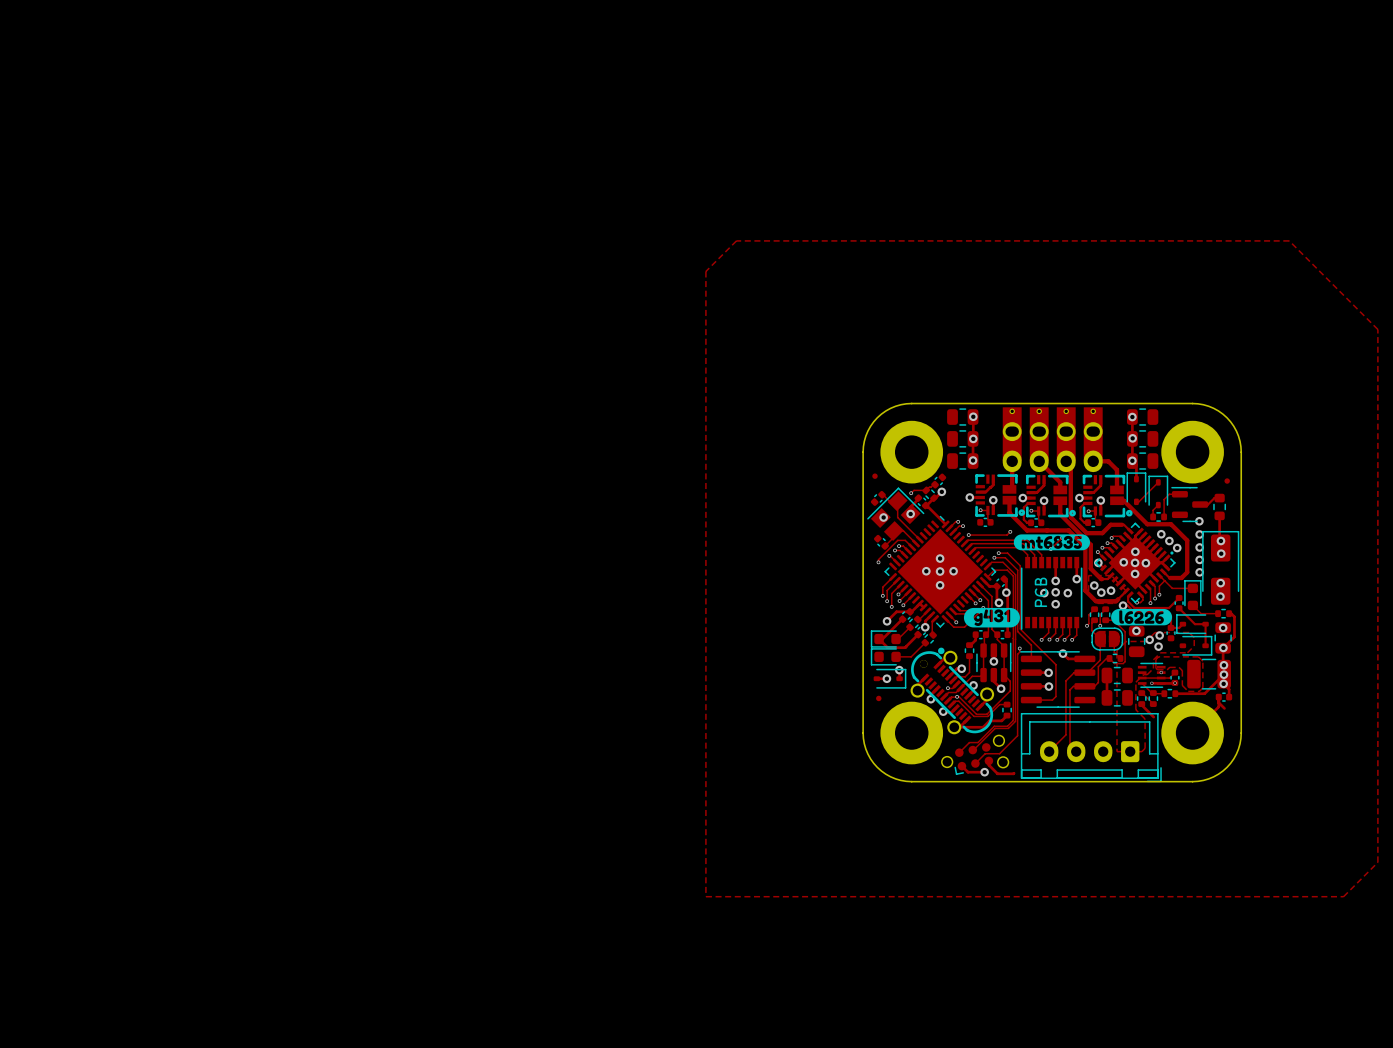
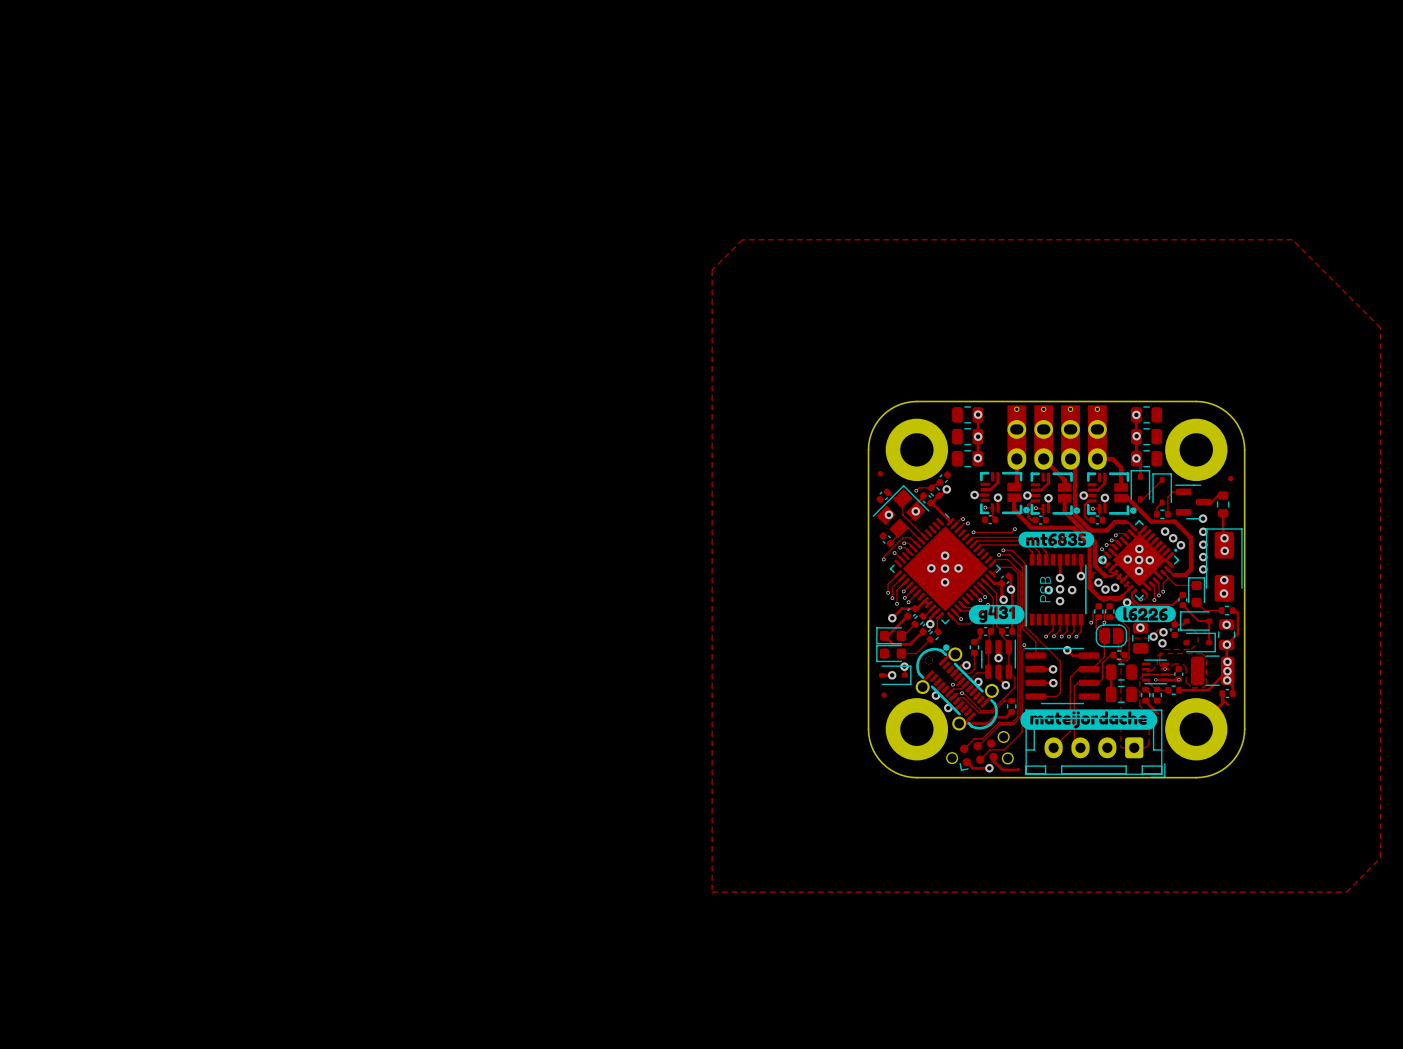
drawing: none -> [1020, 709, 1158, 730]

